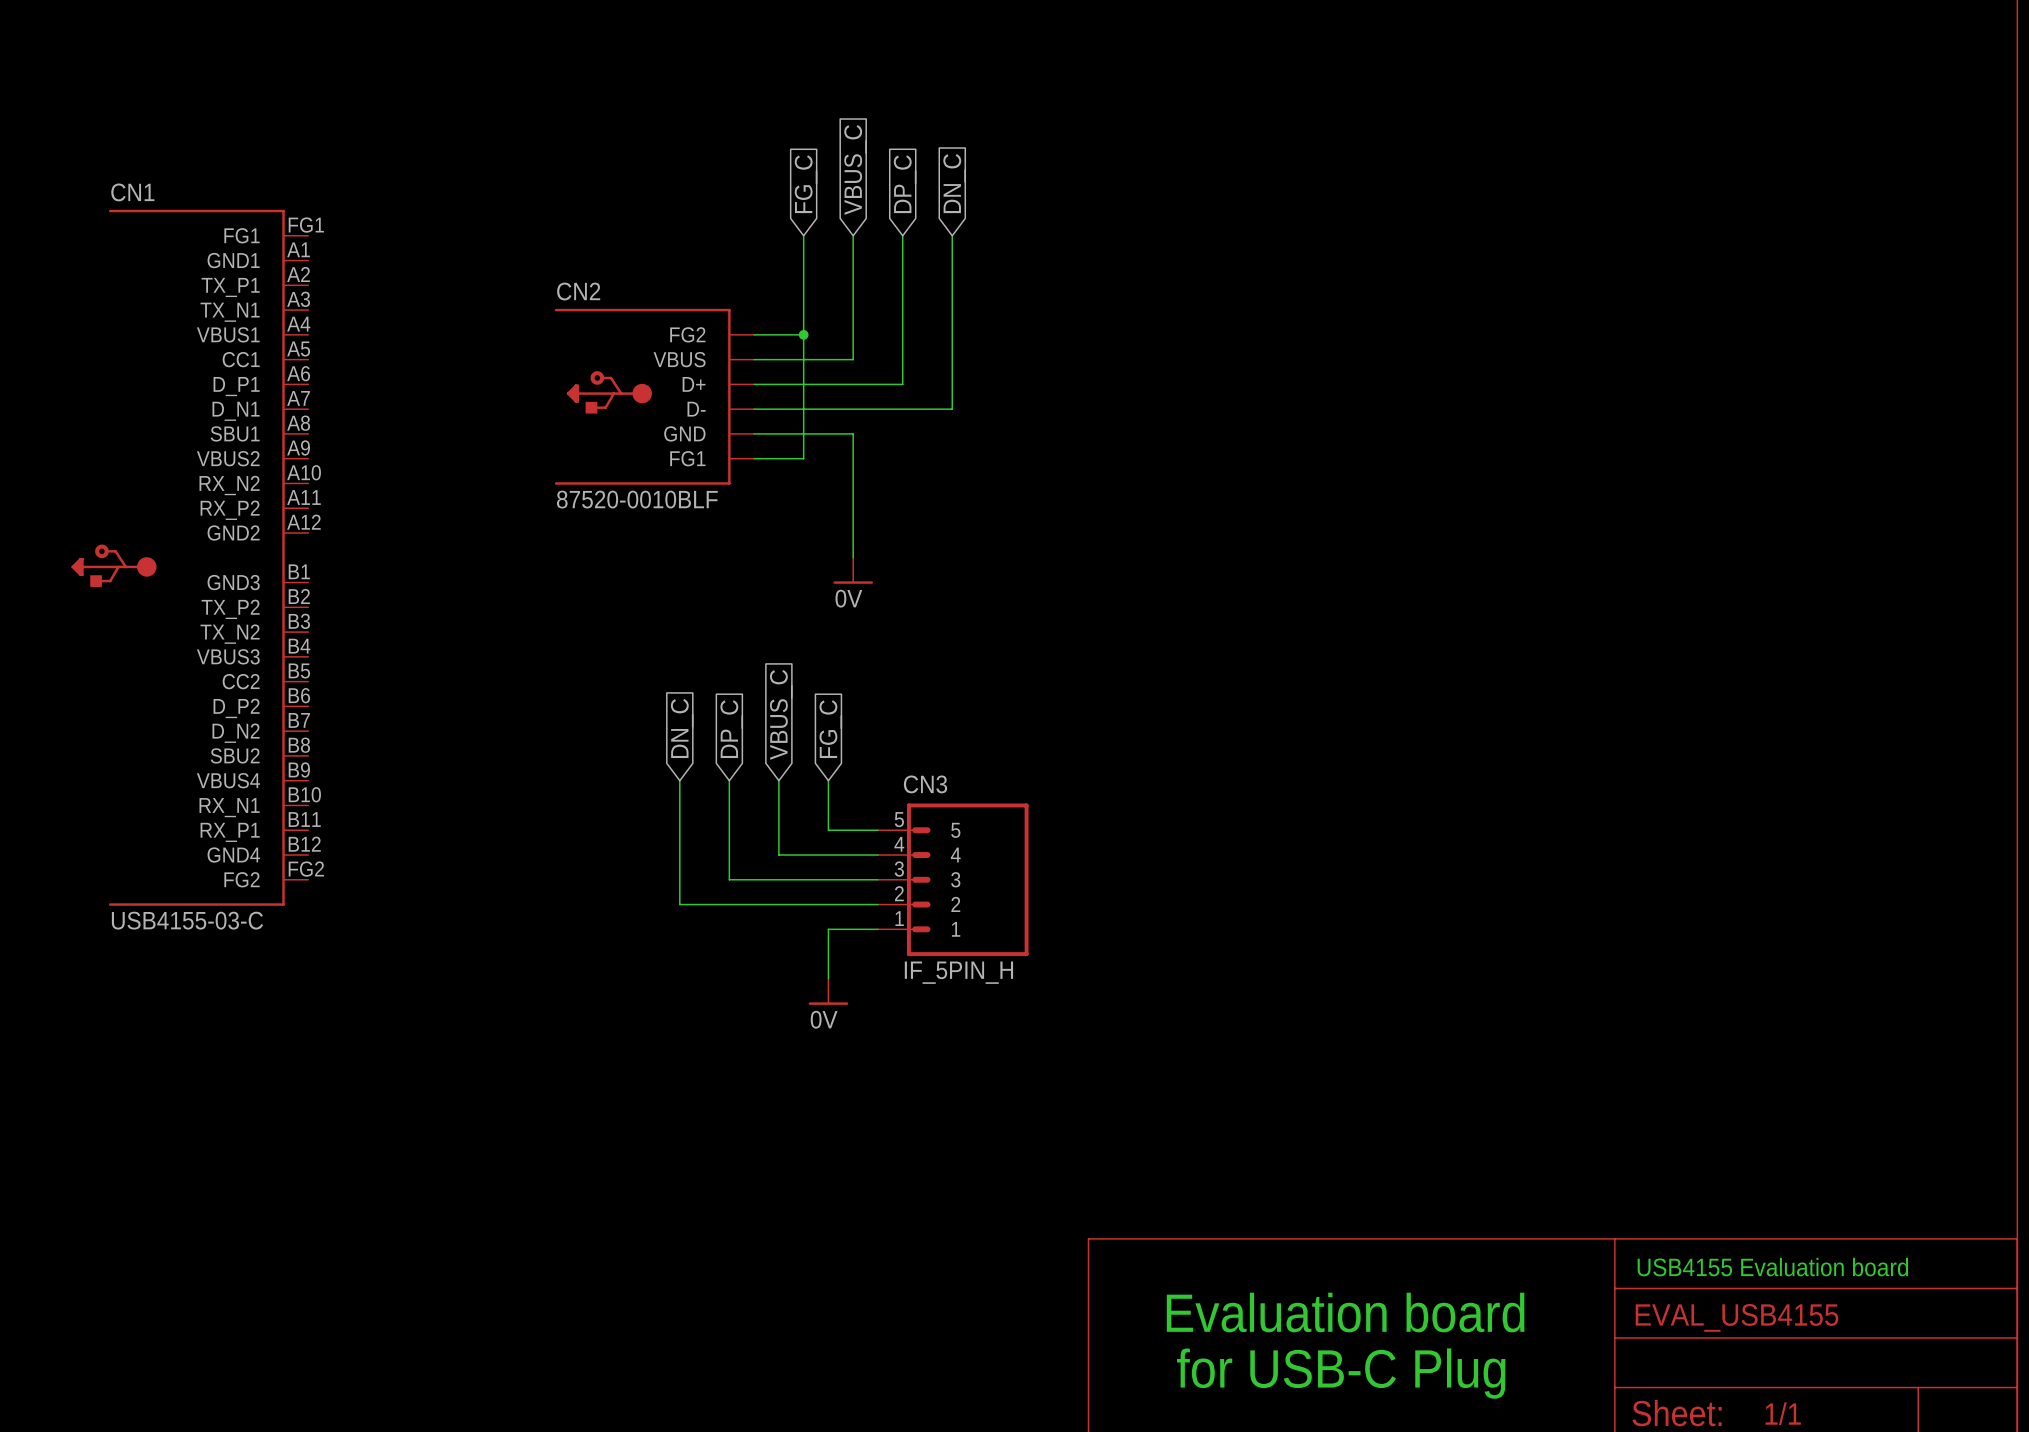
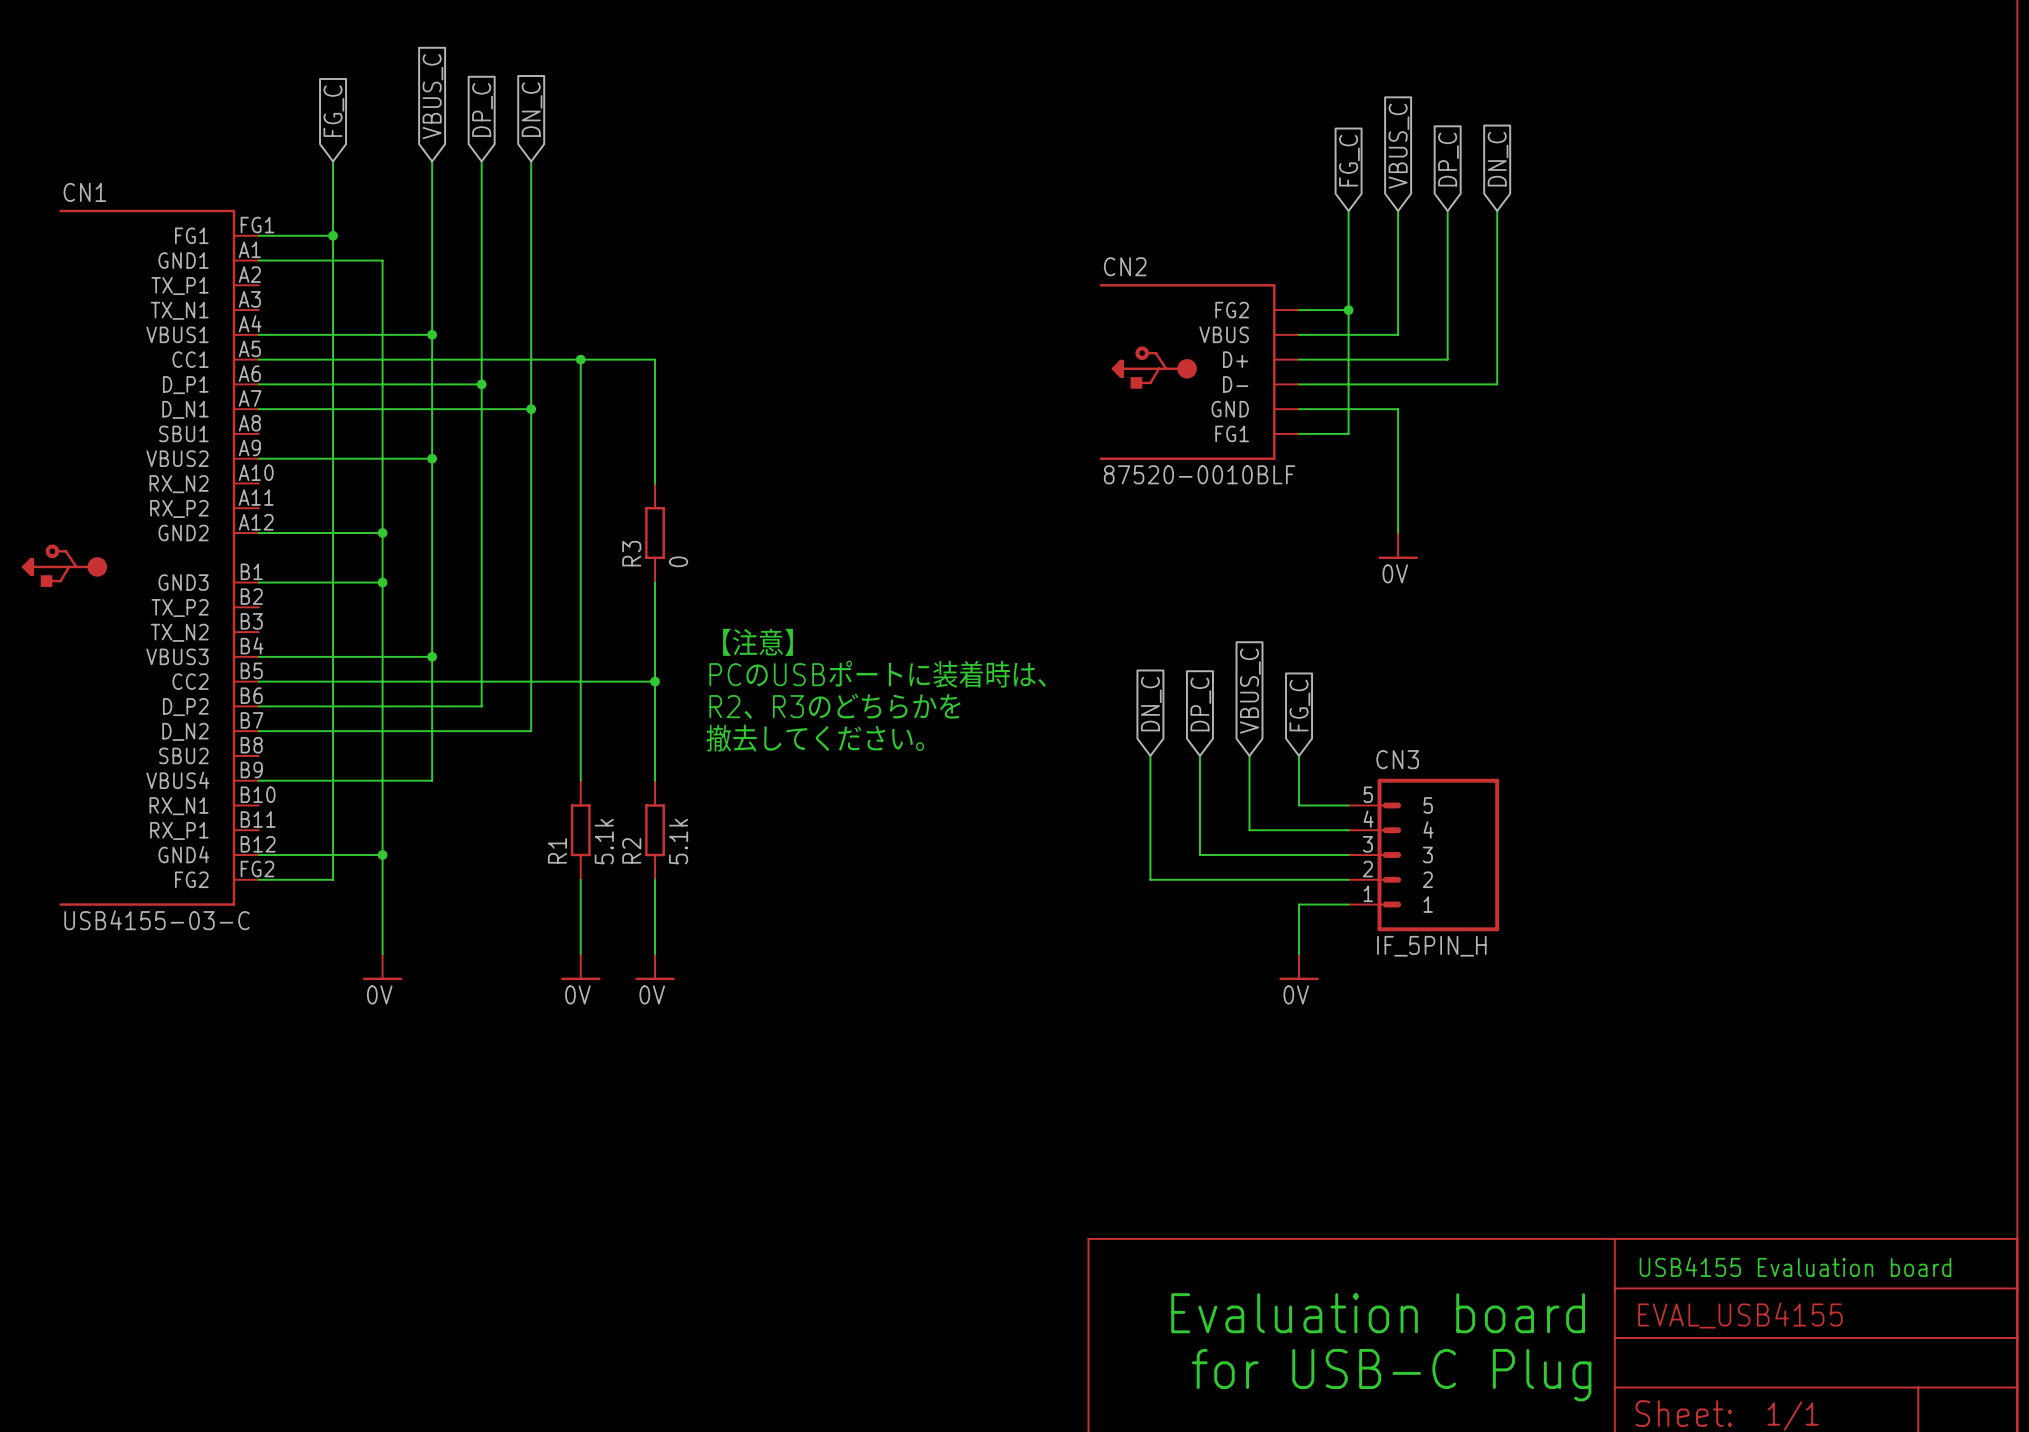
global label: none -> VBUS_C (432, 96)
global label: none -> FG_C (333, 111)
global label: none -> DP_C (482, 110)
global label: none -> DN_C (532, 109)
global label: none -> VBUS_C (1398, 146)
global label: none -> DN_C (1498, 159)
global label: none -> FG_C (1349, 160)
global label: none -> DP_C (1448, 159)
wire: none -> (333, 161) (333, 879) (258, 879)
wire: none -> (432, 161) (432, 780) (258, 780)
wire: none -> (481, 161) (481, 706) (258, 706)
wire: none -> (531, 161) (531, 731) (258, 731)
global label: VBUS_C (855, 169) -> none
global label: DN_C (954, 183) -> none
global label: FG_C (806, 184) -> none
global label: DP_C (905, 184) -> none
wire: none -> (1348, 211) (1348, 433) (1299, 433)
wire: none -> (1398, 211) (1398, 334) (1299, 334)
wire: none -> (1447, 211) (1447, 359) (1299, 359)
wire: none -> (1497, 211) (1497, 384) (1299, 384)
wire: none -> (258, 235) (333, 235)
junction: none -> (333, 235)
wire: (803, 235) (803, 458) (754, 458) -> none
wire: (853, 235) (853, 359) (754, 359) -> none
wire: (902, 235) (902, 384) (754, 384) -> none
wire: (952, 235) (952, 409) (754, 409) -> none
wire: none -> (258, 260) (382, 260) (382, 954)
wire: none -> (1299, 310) (1348, 310)
junction: none -> (1348, 310)
wire: none -> (258, 334) (432, 334)
junction: none -> (432, 334)
wire: (754, 334) (803, 334) -> none
junction: (803, 334) -> none
wire: none -> (258, 359) (655, 359) (655, 483)
wire: none -> (580, 359) (580, 780)
junction: none -> (580, 359)
wire: none -> (258, 384) (481, 384)
junction: none -> (481, 384)
CN2 position: (654, 396) -> (1199, 372)
wire: none -> (258, 409) (531, 409)
junction: none -> (531, 409)
wire: none -> (1299, 409) (1398, 409) (1398, 533)
wire: (754, 433) (853, 433) (853, 557) -> none
wire: none -> (258, 458) (432, 458)
junction: none -> (432, 458)
wire: none -> (258, 533) (382, 533)
junction: none -> (382, 533)
R3: none -> 0 (655, 533)
power symbol: none -> 0V (1398, 546)
CN1 position: (189, 557) -> (140, 557)
power symbol: 0V (853, 570) -> none
wire: none -> (258, 582) (382, 582)
junction: none -> (382, 582)
wire: none -> (655, 582) (655, 780)
text: none -> 【注意】 (758, 642)
wire: none -> (258, 656) (432, 656)
junction: none -> (432, 656)
text: none -> PCのUSBポートに装着時は、 (878, 674)
wire: none -> (258, 681) (655, 681)
junction: none -> (655, 681)
global label: none -> VBUS_C (1250, 691)
global label: none -> DN_C (1151, 704)
global label: none -> DP_C (1200, 704)
global label: none -> FG_C (1299, 705)
text: none -> R2、R3のどちらかを (835, 706)
global label: VBUS_C (781, 714) -> none
global label: DN_C (682, 728) -> none
global label: DP_C (731, 729) -> none
global label: FG_C (830, 729) -> none
text: none -> 撤去してください。 (815, 738)
wire: none -> (1150, 755) (1150, 879) (1348, 879)
wire: none -> (1199, 755) (1199, 855) (1348, 855)
wire: none -> (1249, 755) (1249, 830) (1348, 830)
wire: none -> (1299, 755) (1299, 805) (1348, 805)
wire: (679, 780) (679, 904) (877, 904) -> none
wire: (729, 780) (729, 879) (877, 879) -> none
wire: (778, 780) (778, 855) (877, 855) -> none
wire: (828, 780) (828, 830) (877, 830) -> none
R1: none -> 5.1k (580, 830)
R2: none -> 5.1k (655, 830)
wire: none -> (258, 855) (382, 855)
junction: none -> (382, 855)
wire: none -> (580, 879) (580, 954)
wire: none -> (655, 879) (655, 954)
CN3 position: (953, 879) -> (1423, 855)
wire: none -> (1348, 904) (1299, 904) (1299, 954)
wire: (877, 929) (828, 929) (828, 978) -> none
power symbol: none -> 0V (382, 967)
power symbol: none -> 0V (580, 967)
power symbol: none -> 0V (655, 967)
power symbol: none -> 0V (1299, 967)
power symbol: 0V (828, 991) -> none

